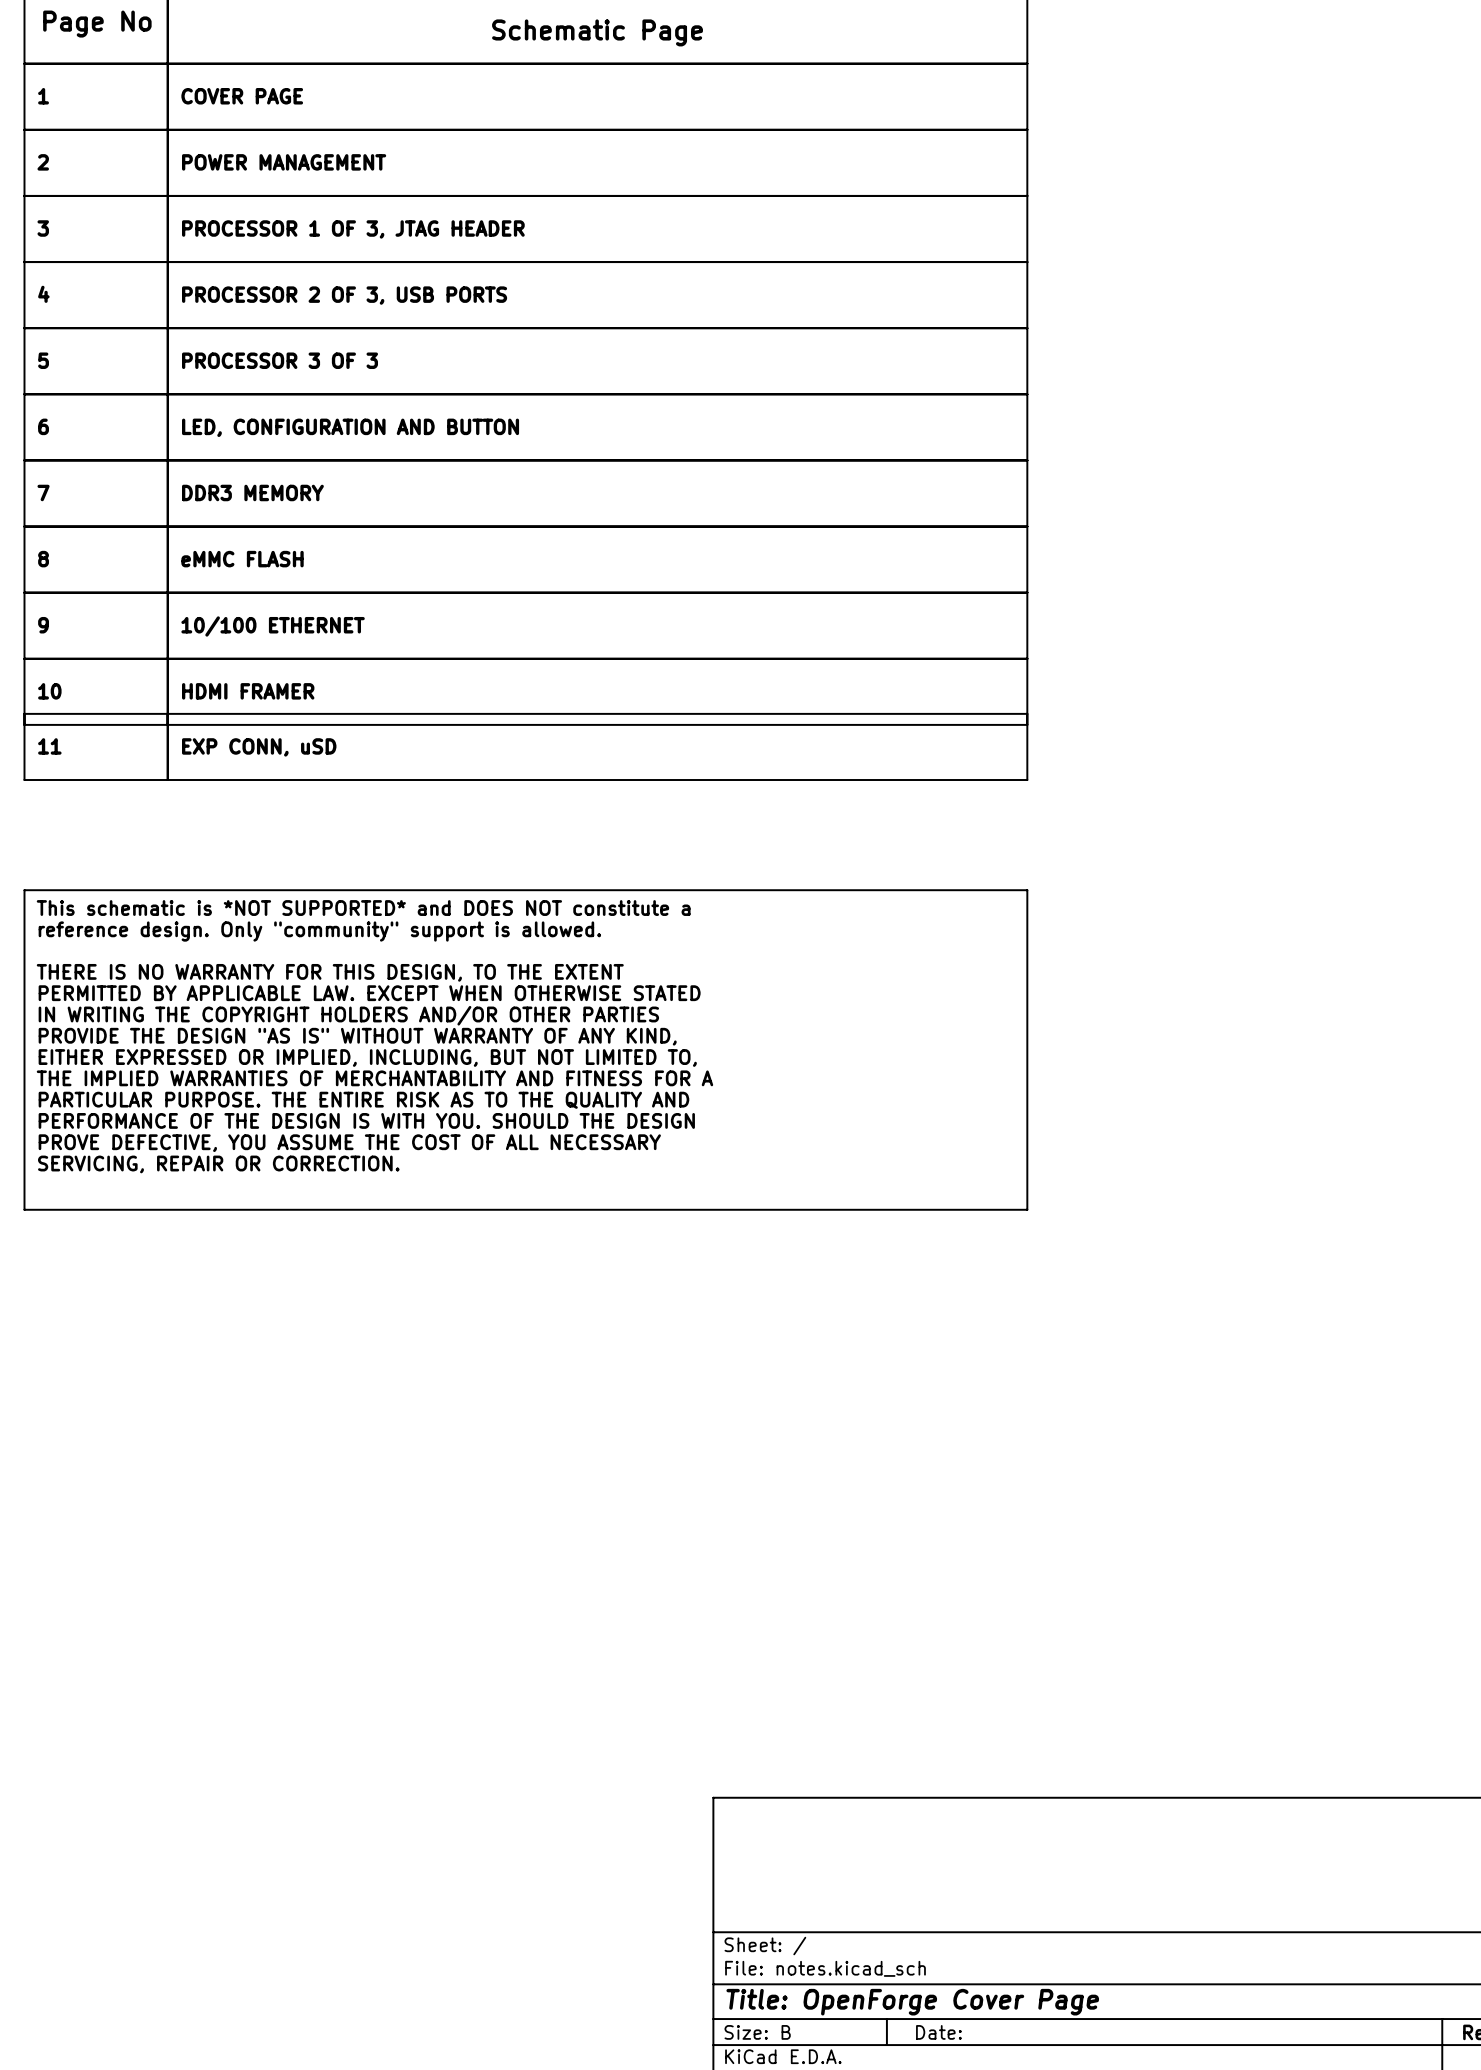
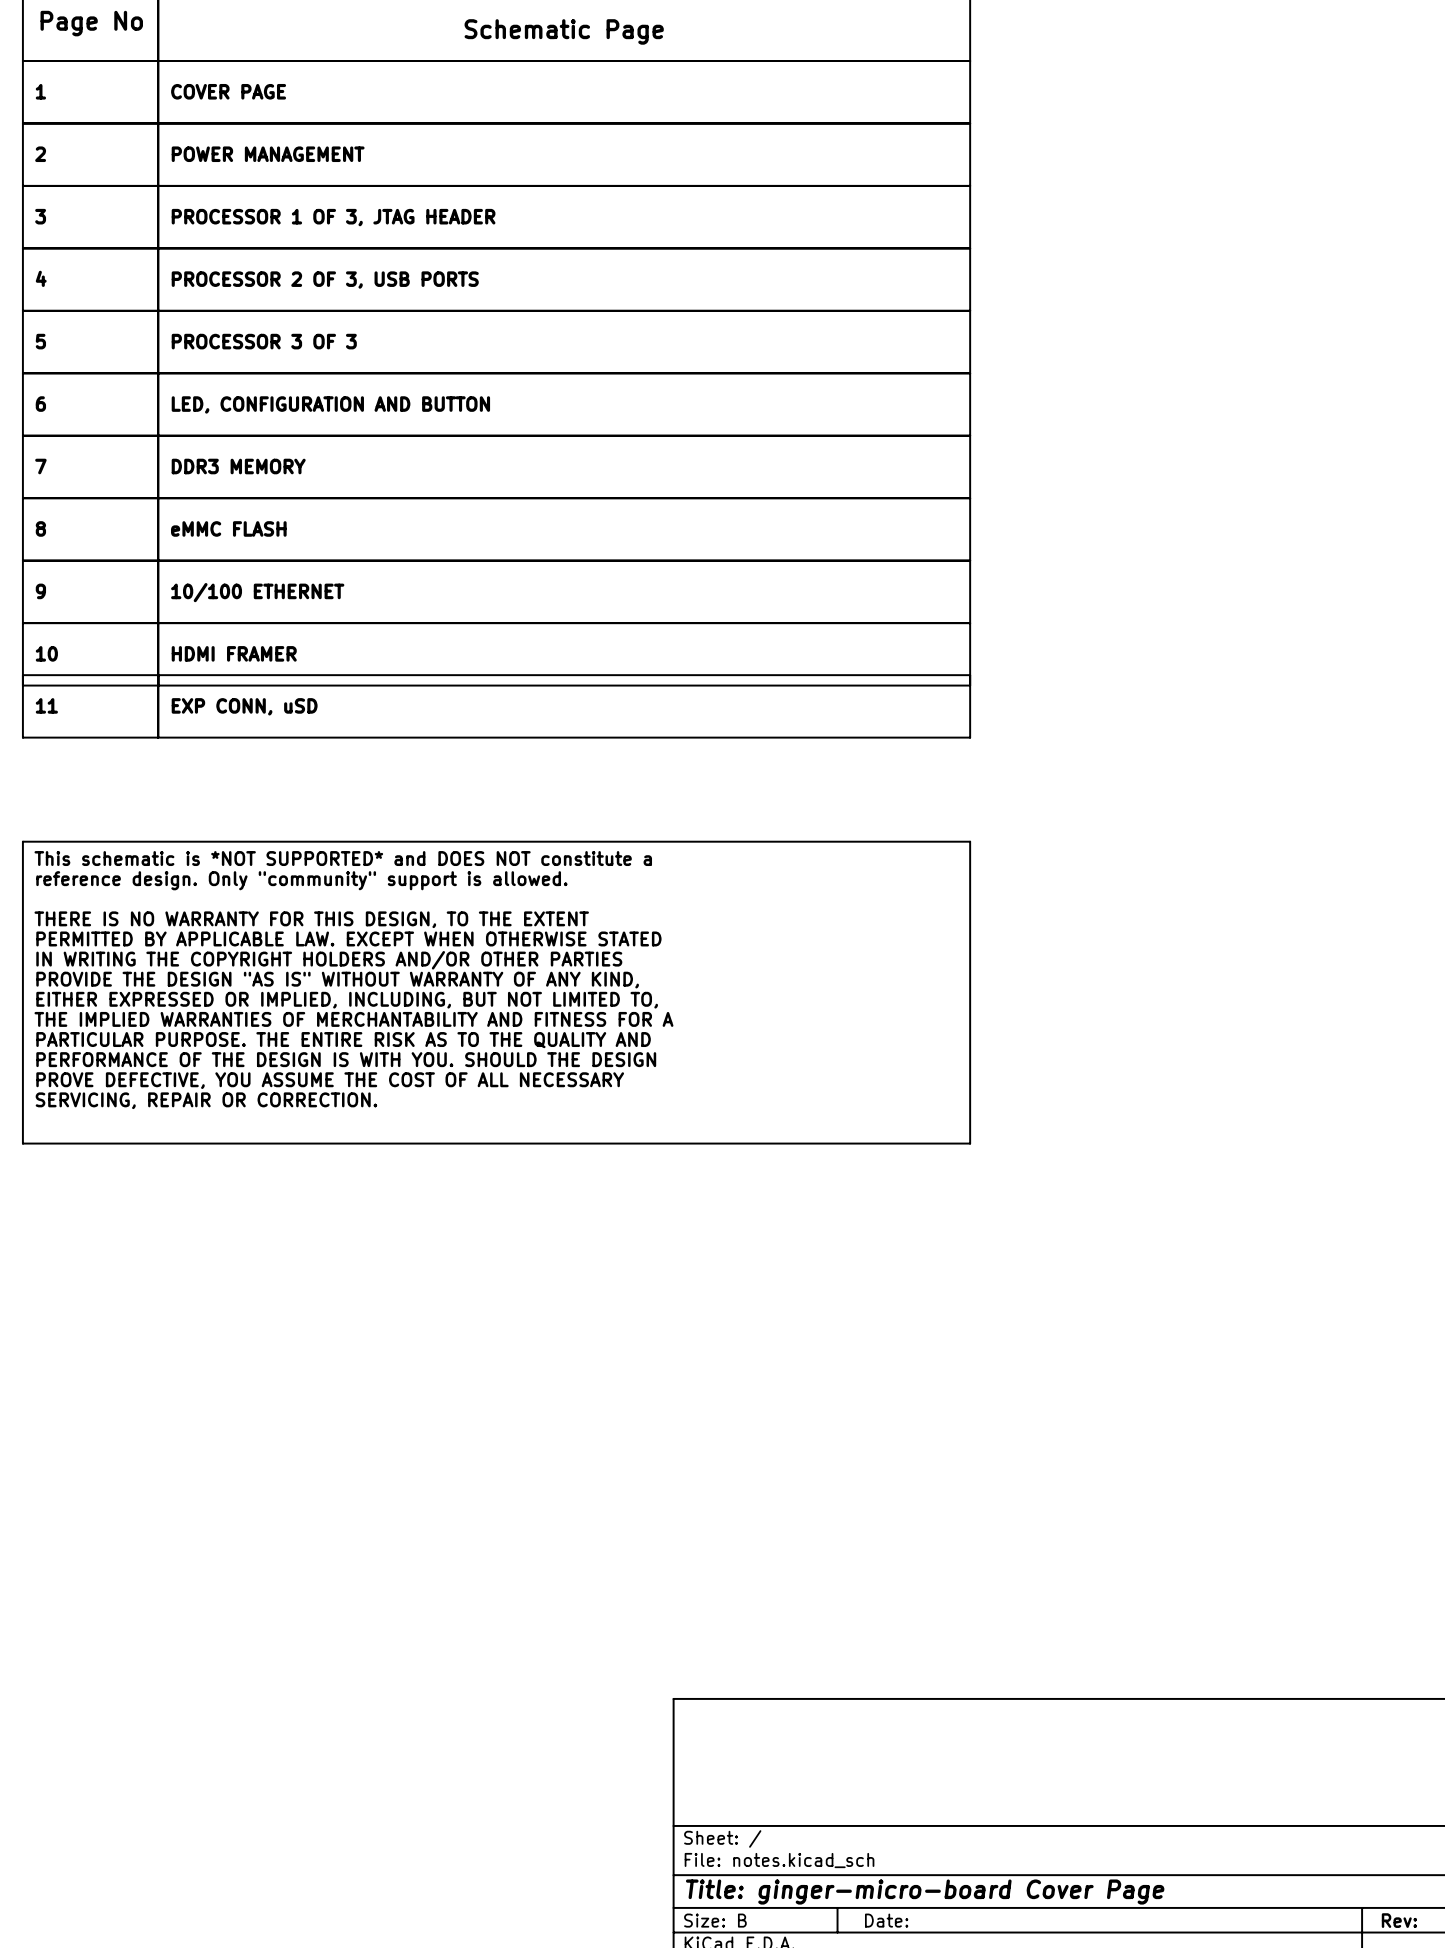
title block: Title: OpenForge Cover Page (912, 2002) -> Title: ginger-micro-board Cover Page (925, 1892)

